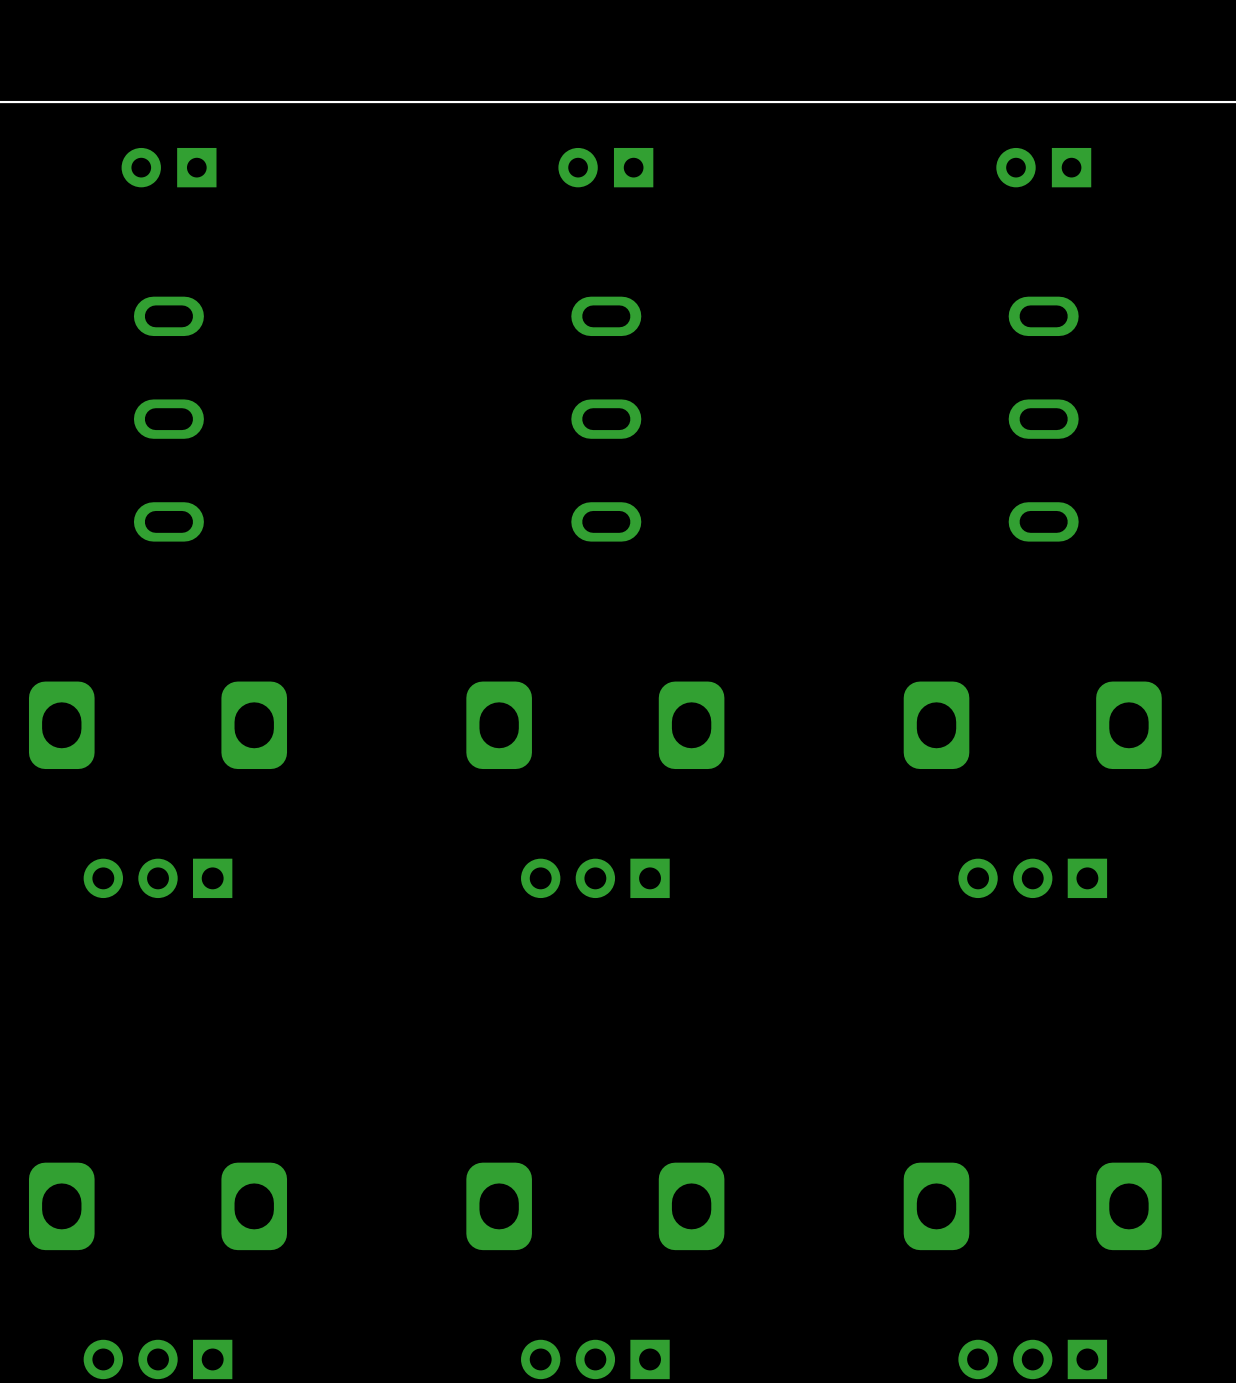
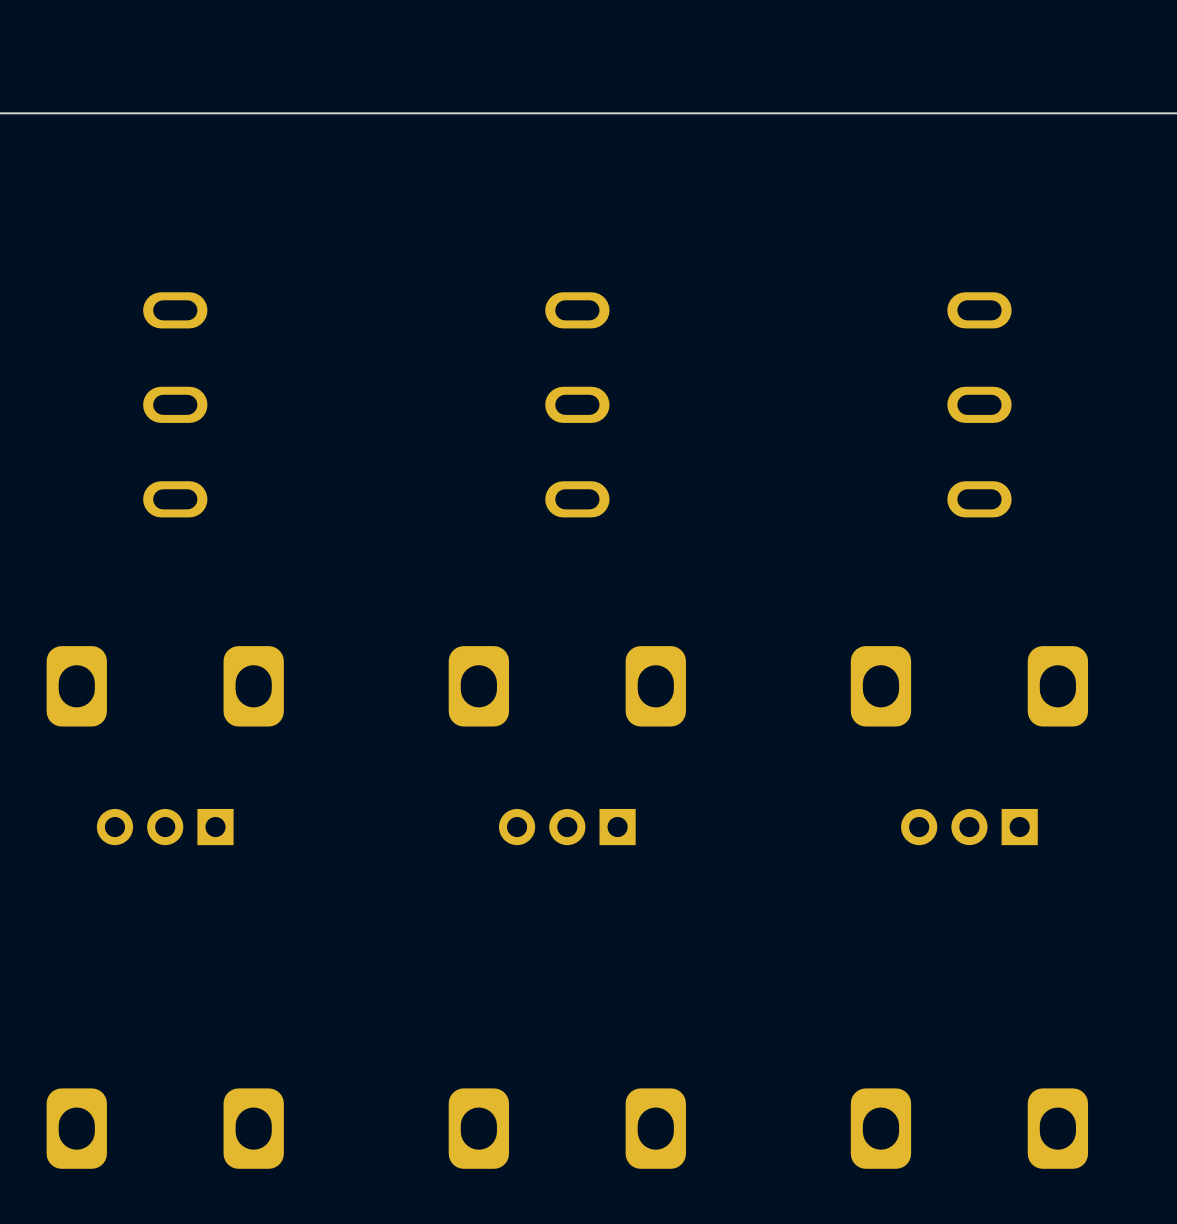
part: (169, 167) -> none
part: (605, 167) -> none
part: (1043, 167) -> none

